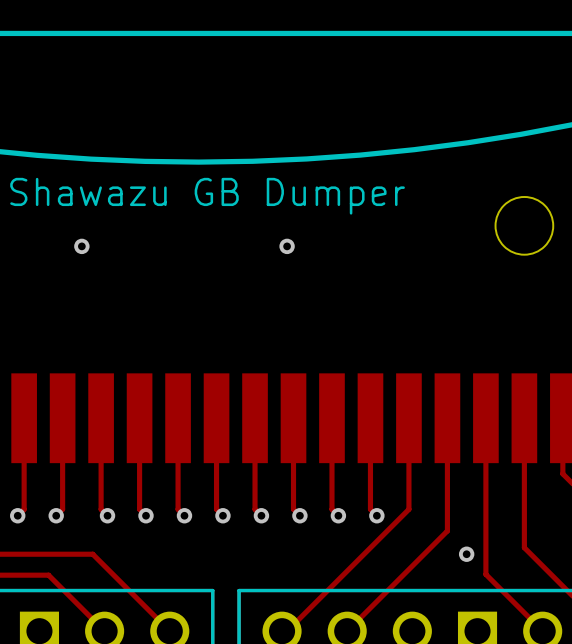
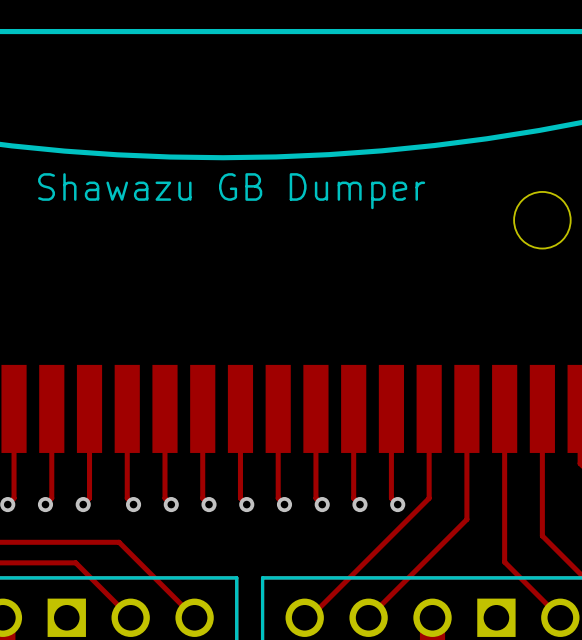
via: (81, 246) -> none
via: (287, 246) -> none
via: (466, 554) -> none

